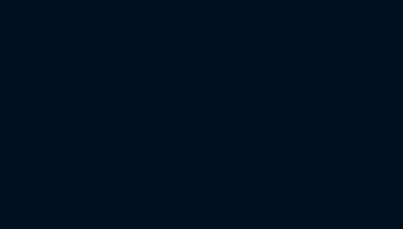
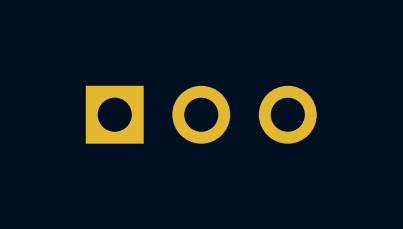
part: none -> (201, 114)

